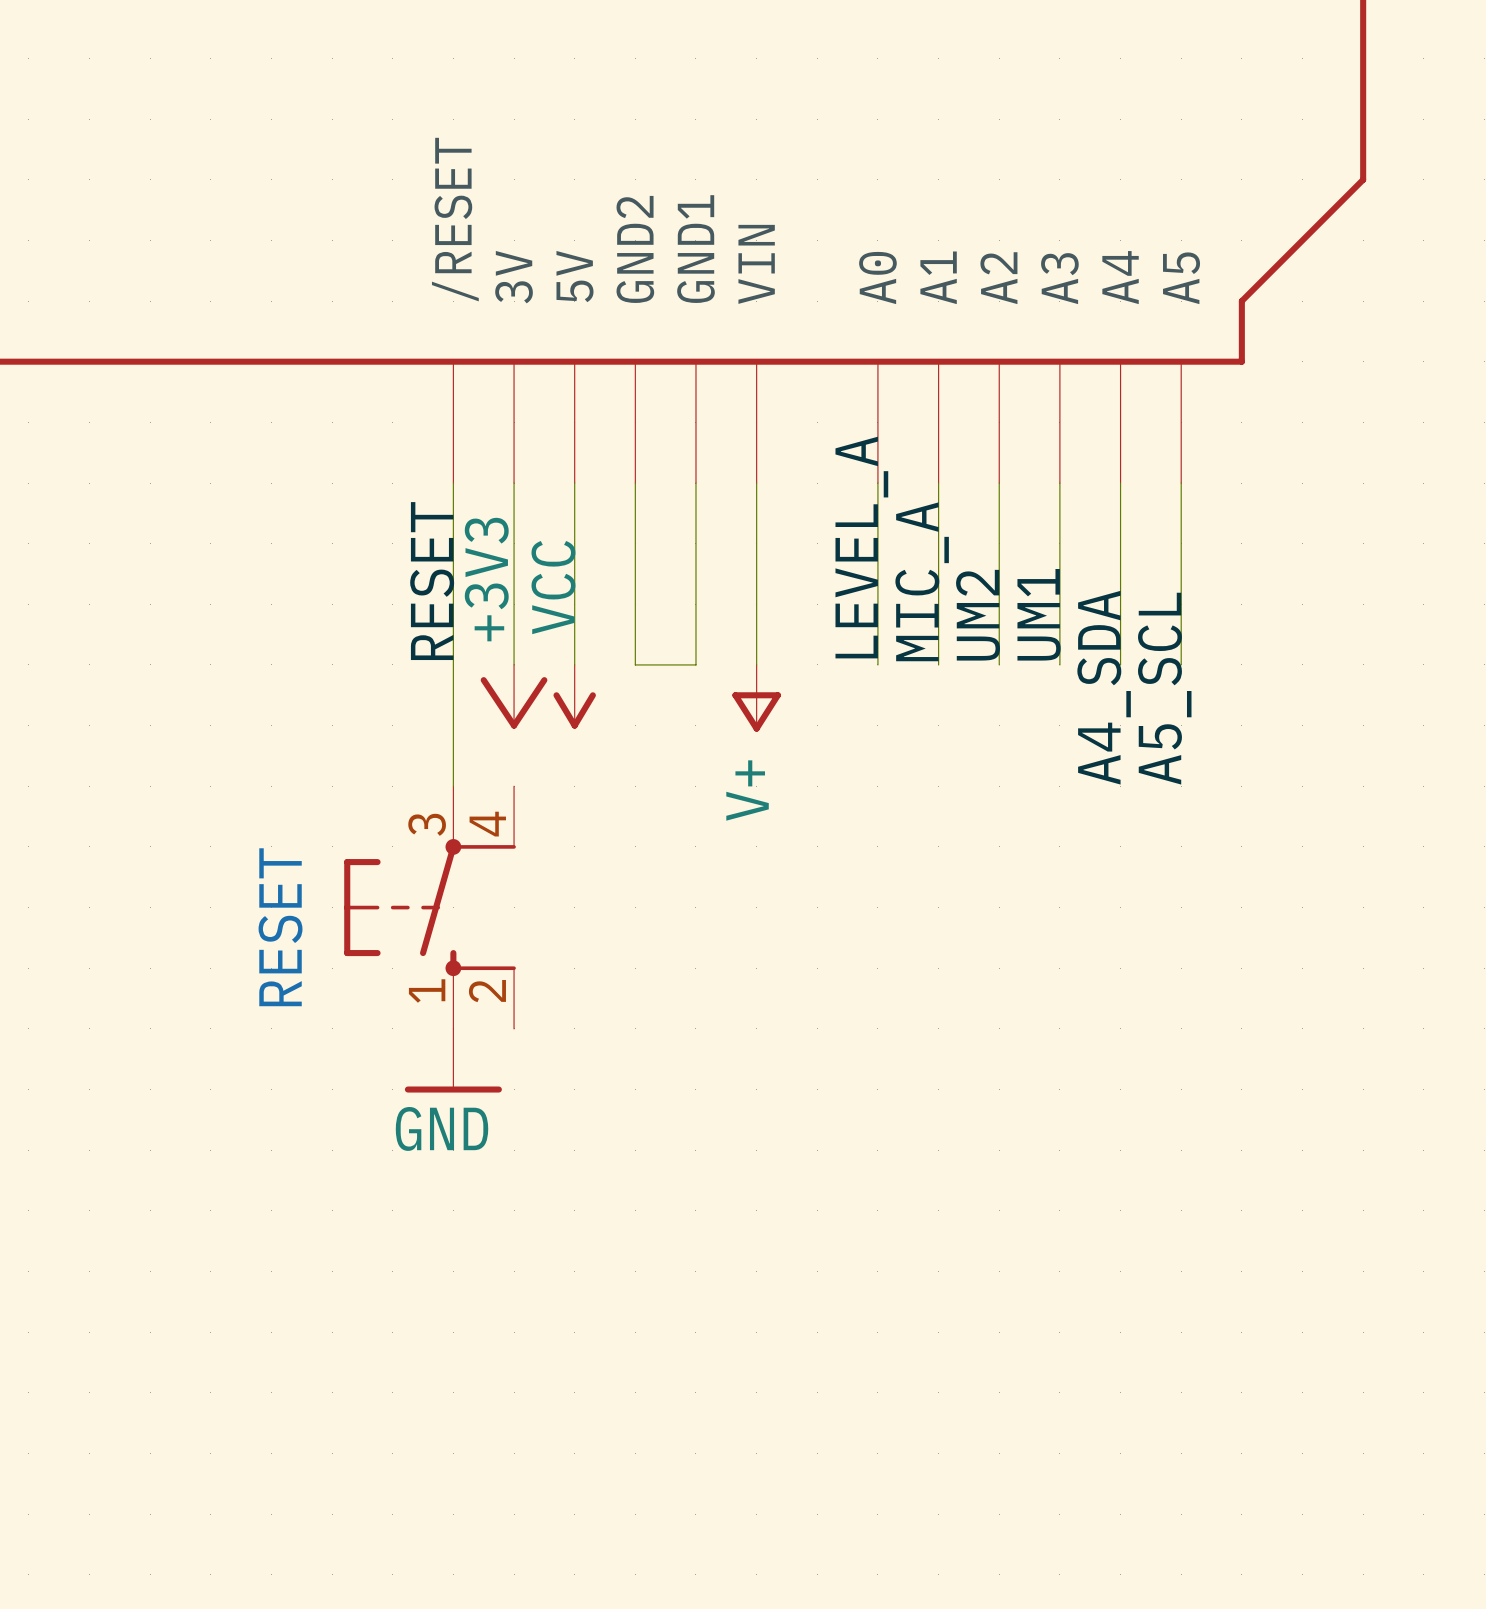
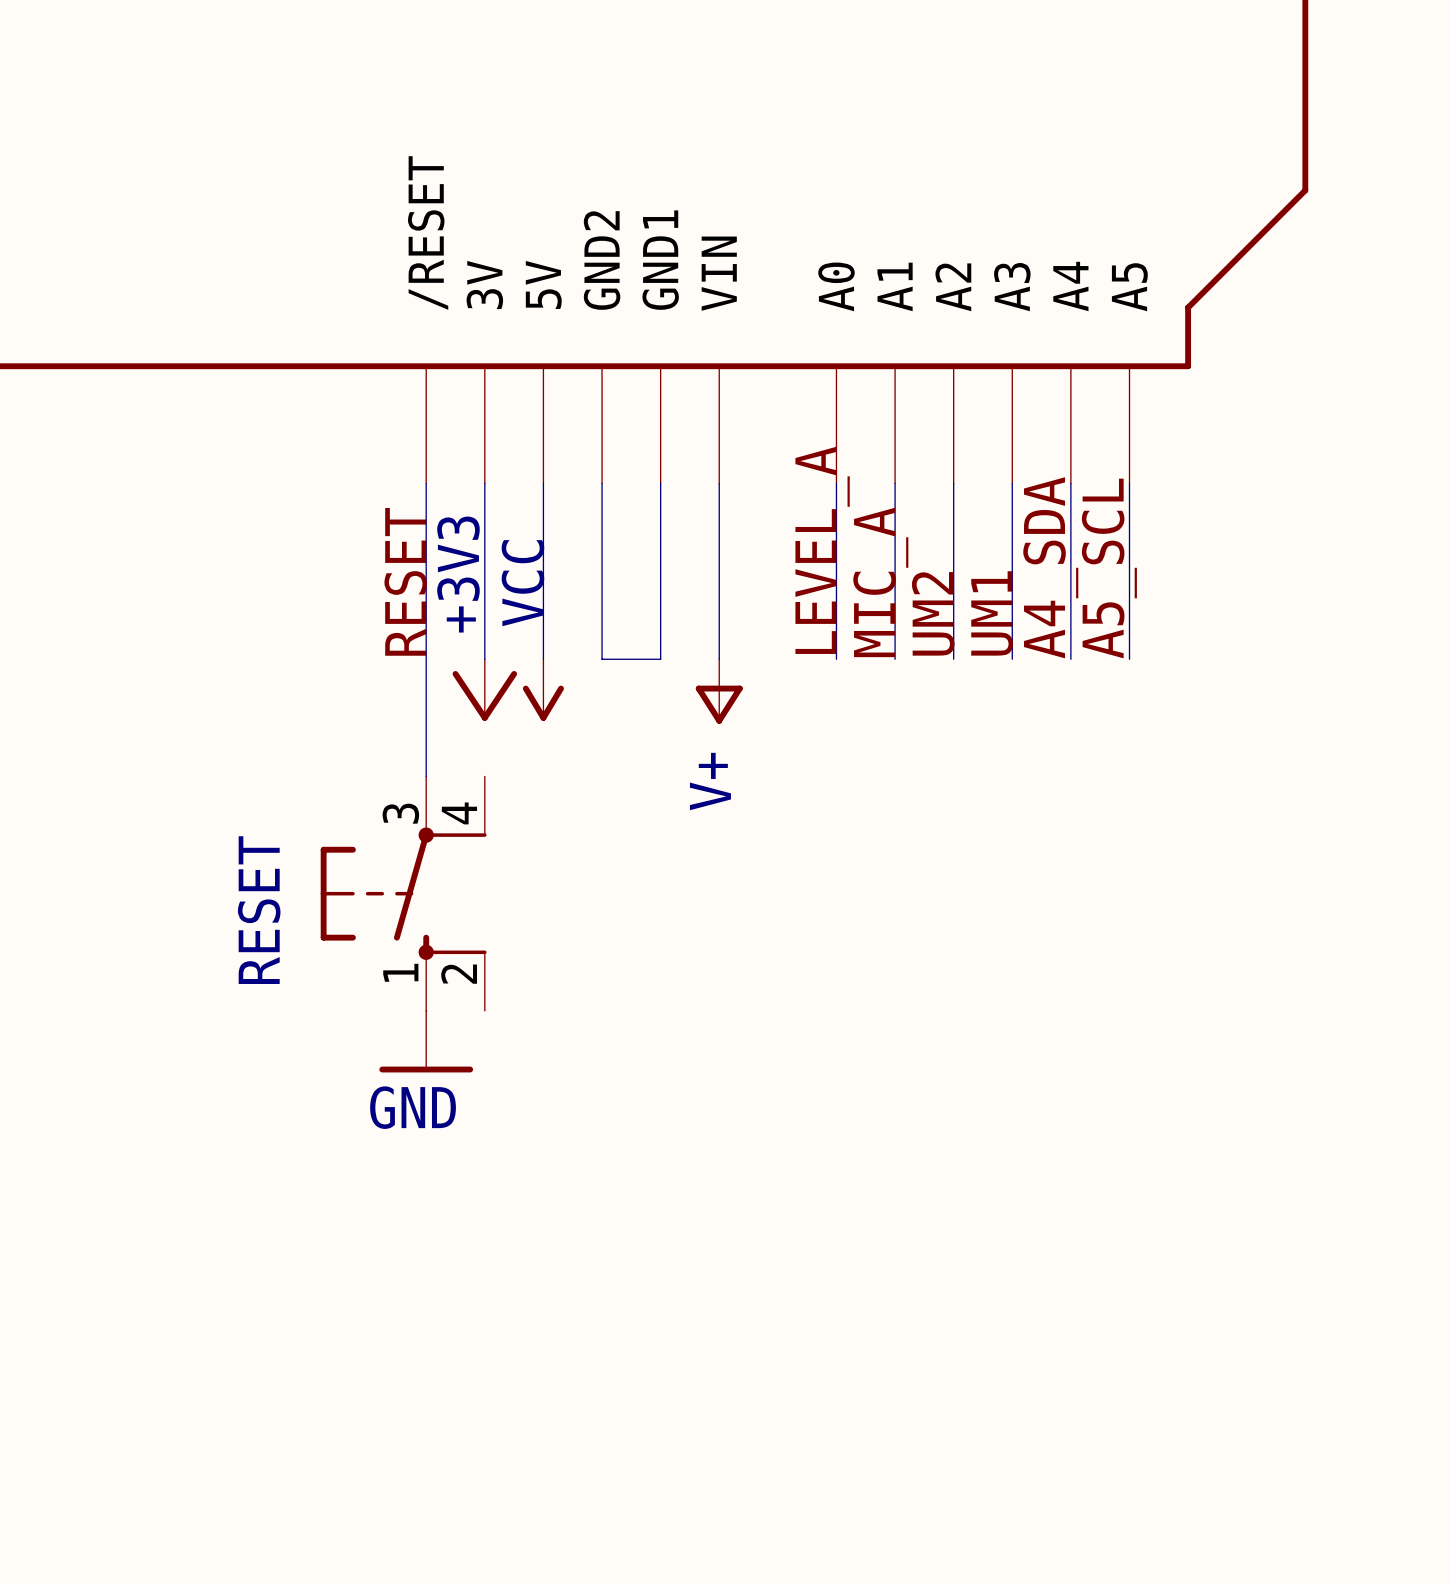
label position: A4_SDA (1104, 687) -> A4_SDA (1050, 567)
label position: A5_SCL (1164, 688) -> A5_SCL (1109, 568)

